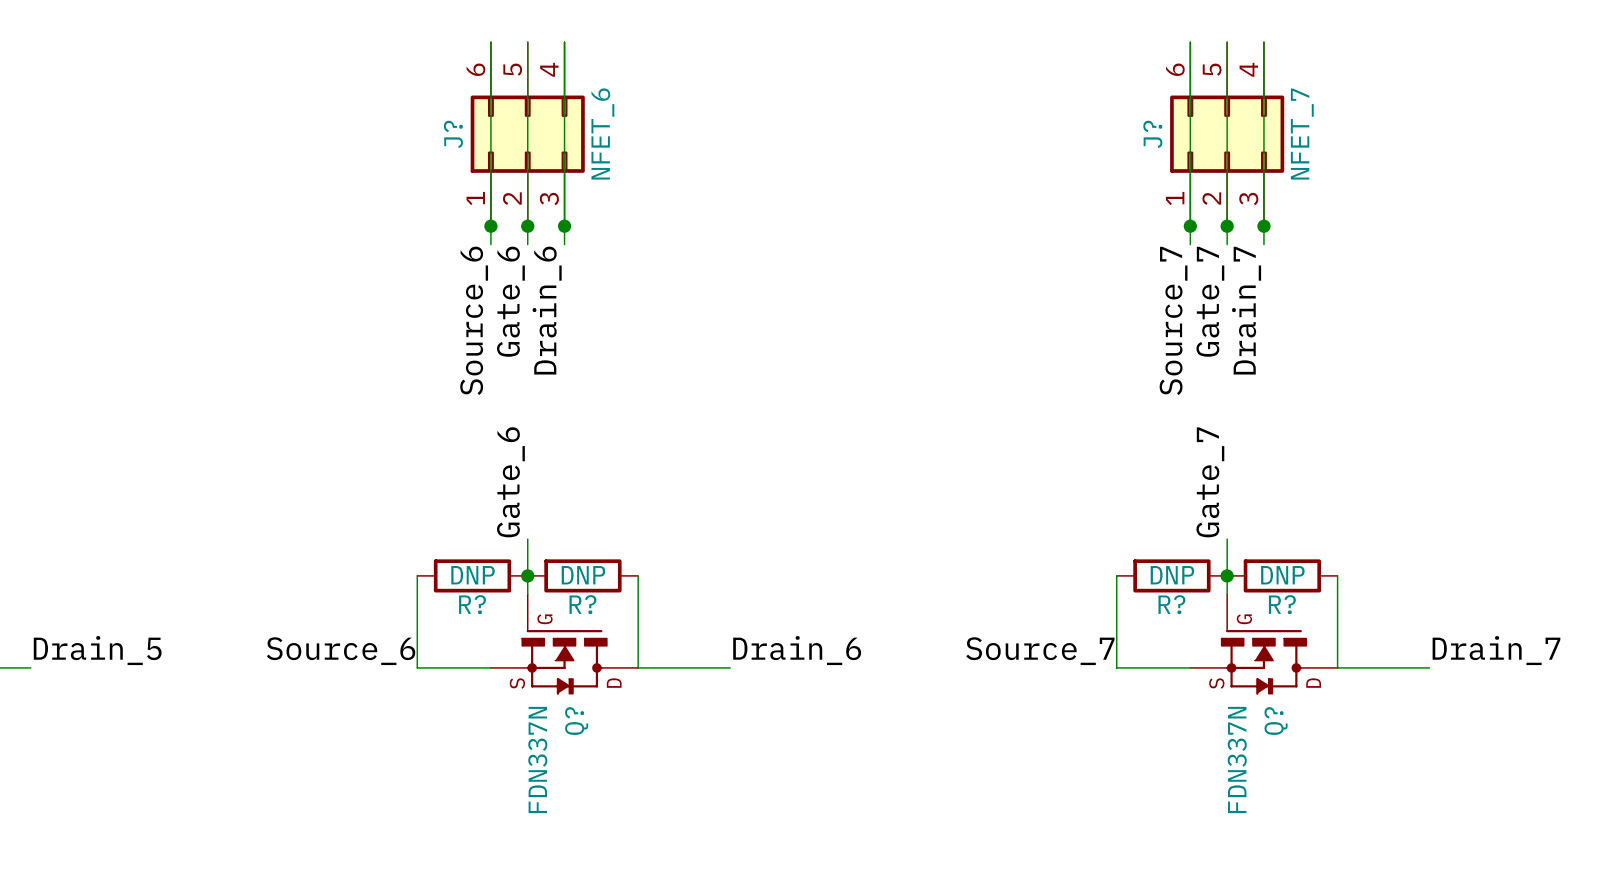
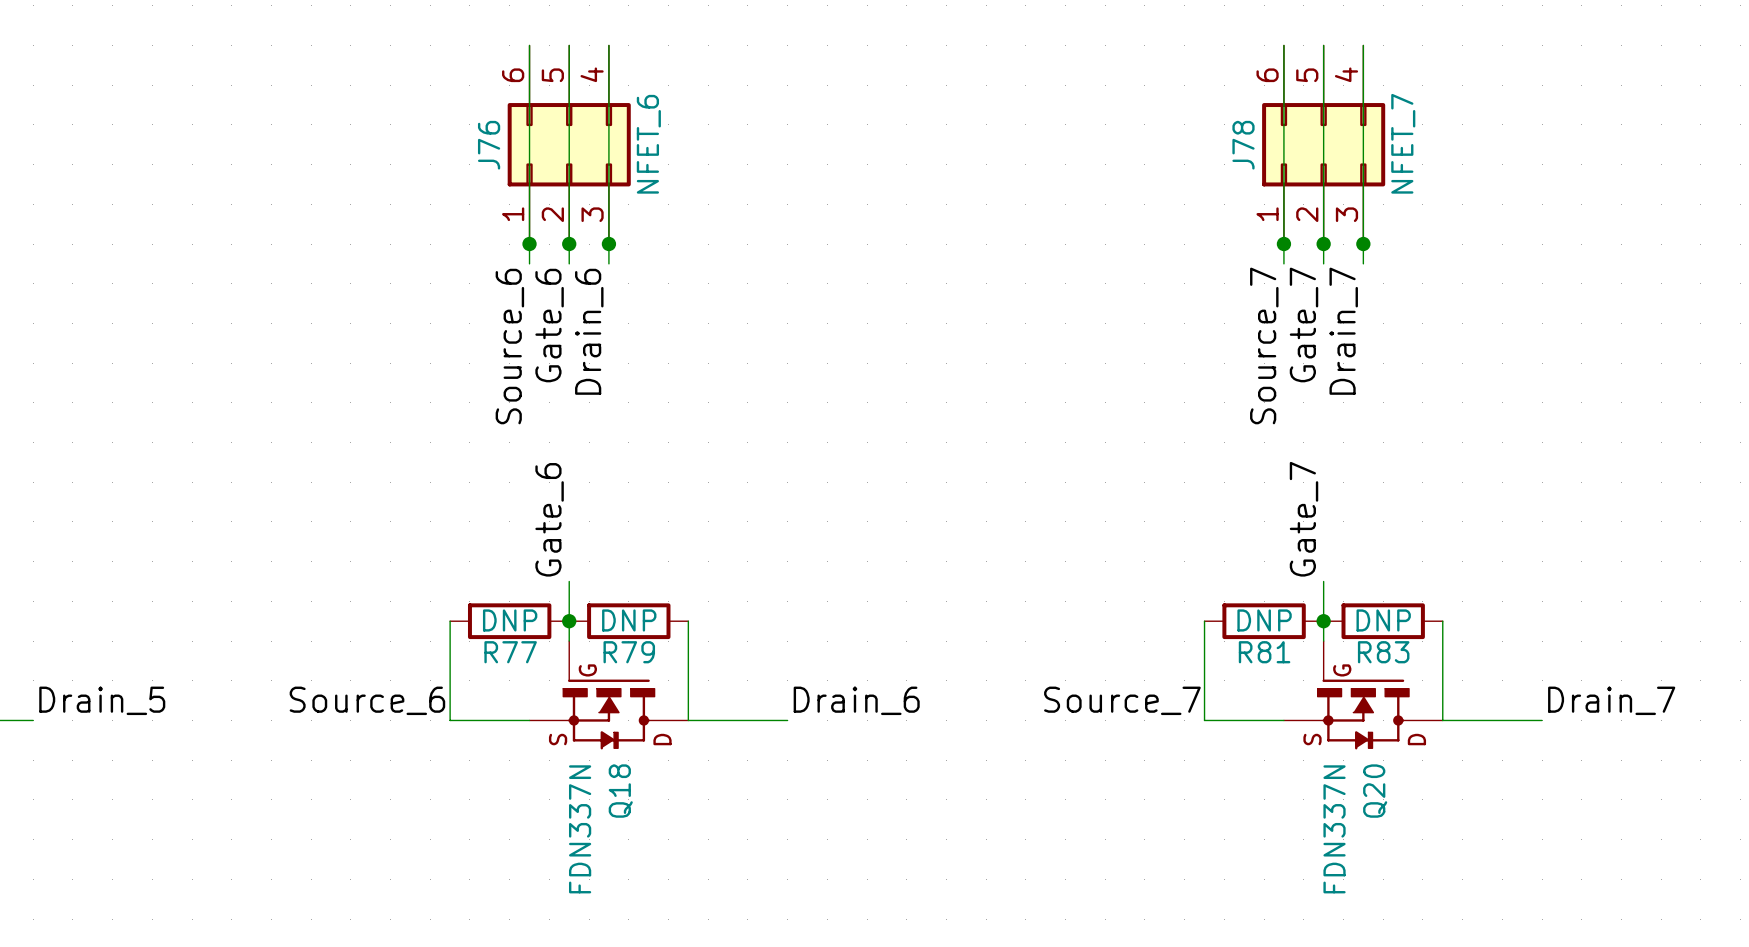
J? name: J? (453, 134) -> J76 (489, 145)
J? name: J? (1152, 134) -> J78 (1243, 145)
R? name: R? (472, 604) -> R77 (510, 652)
R? name: R? (582, 604) -> R79 (629, 652)
R? name: R? (1171, 604) -> R81 (1264, 652)
R? name: R? (1282, 604) -> R83 (1383, 652)
Q? name: Q? (576, 721) -> Q18 (620, 791)
Q? name: Q? (1276, 721) -> Q20 (1375, 791)

